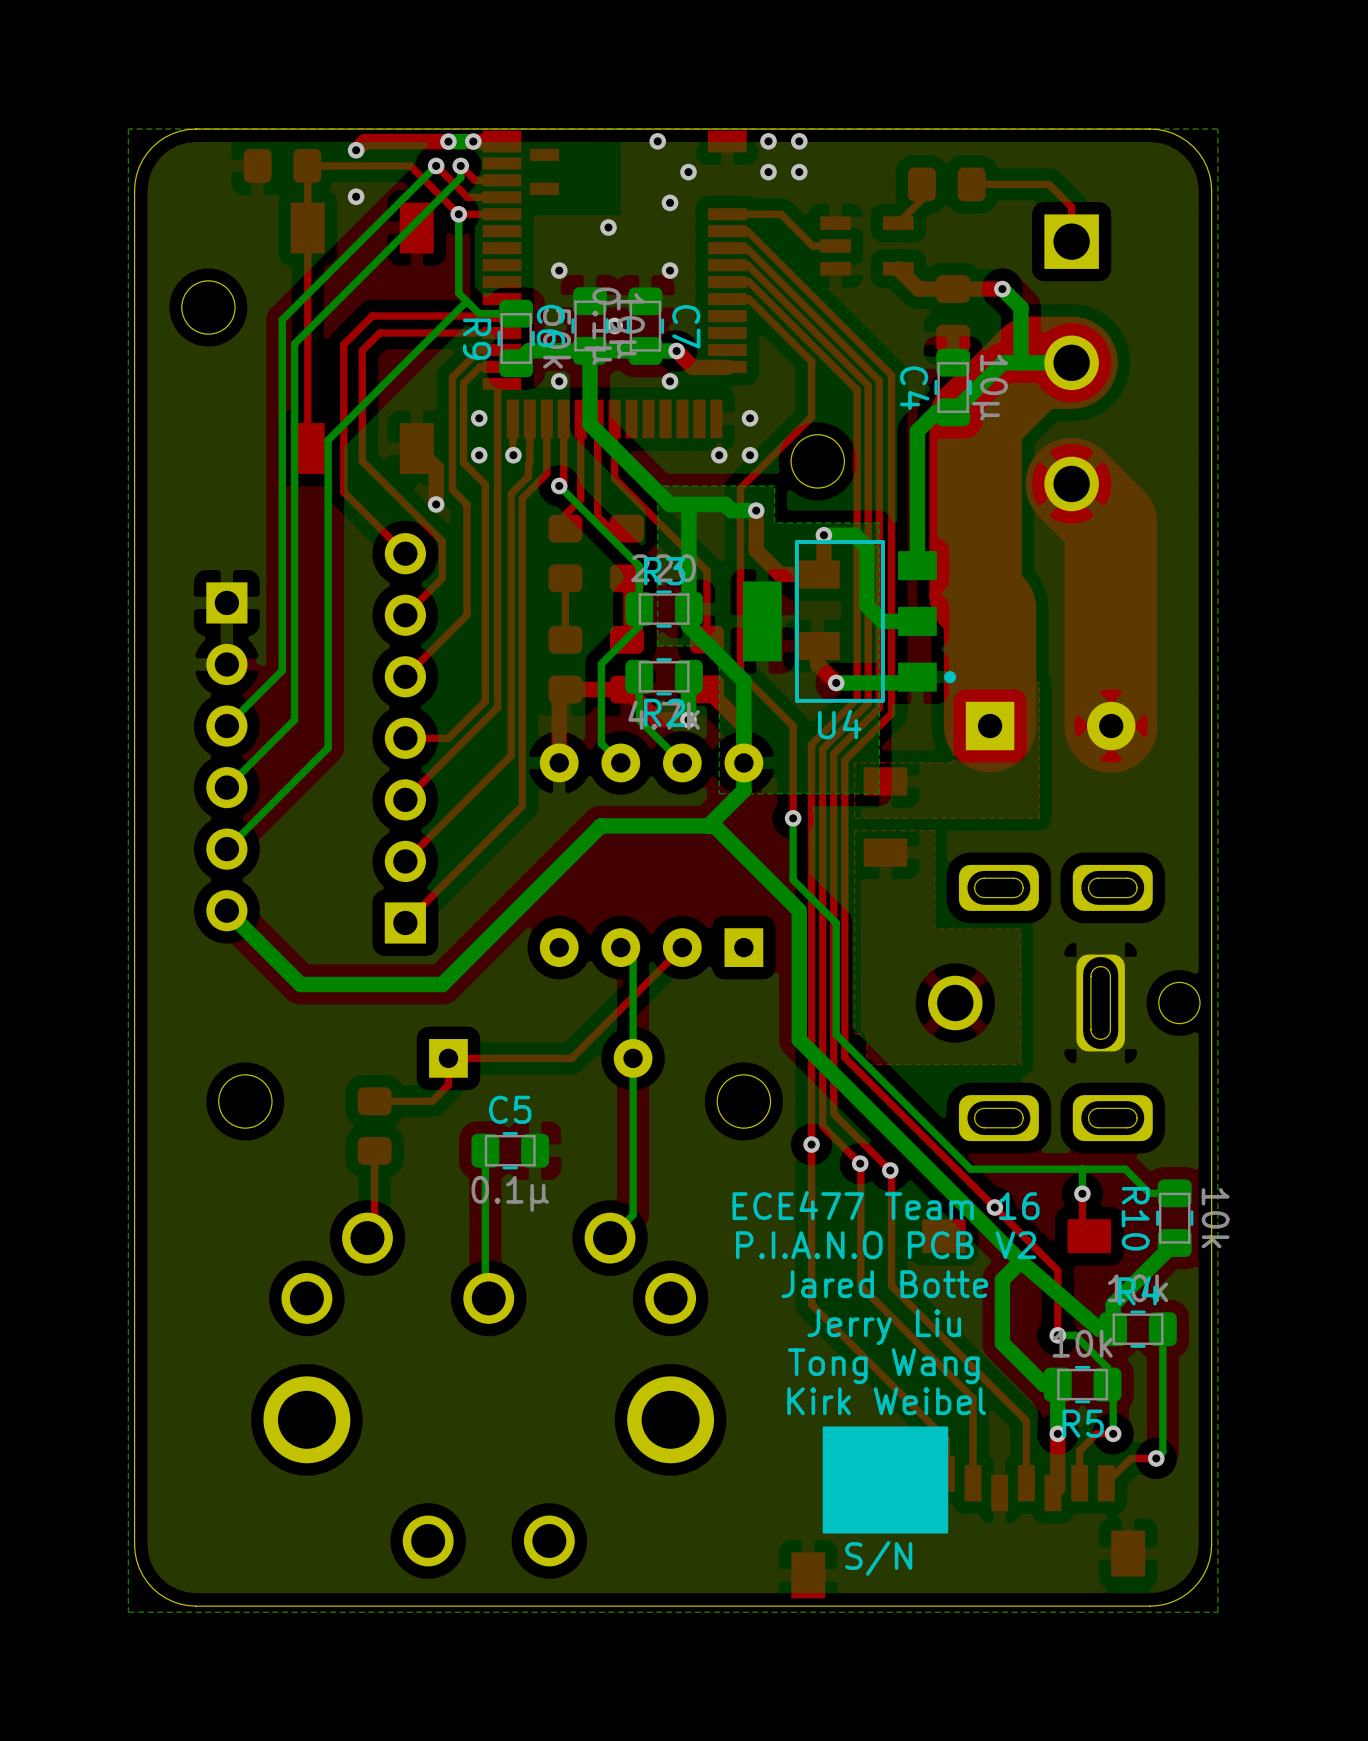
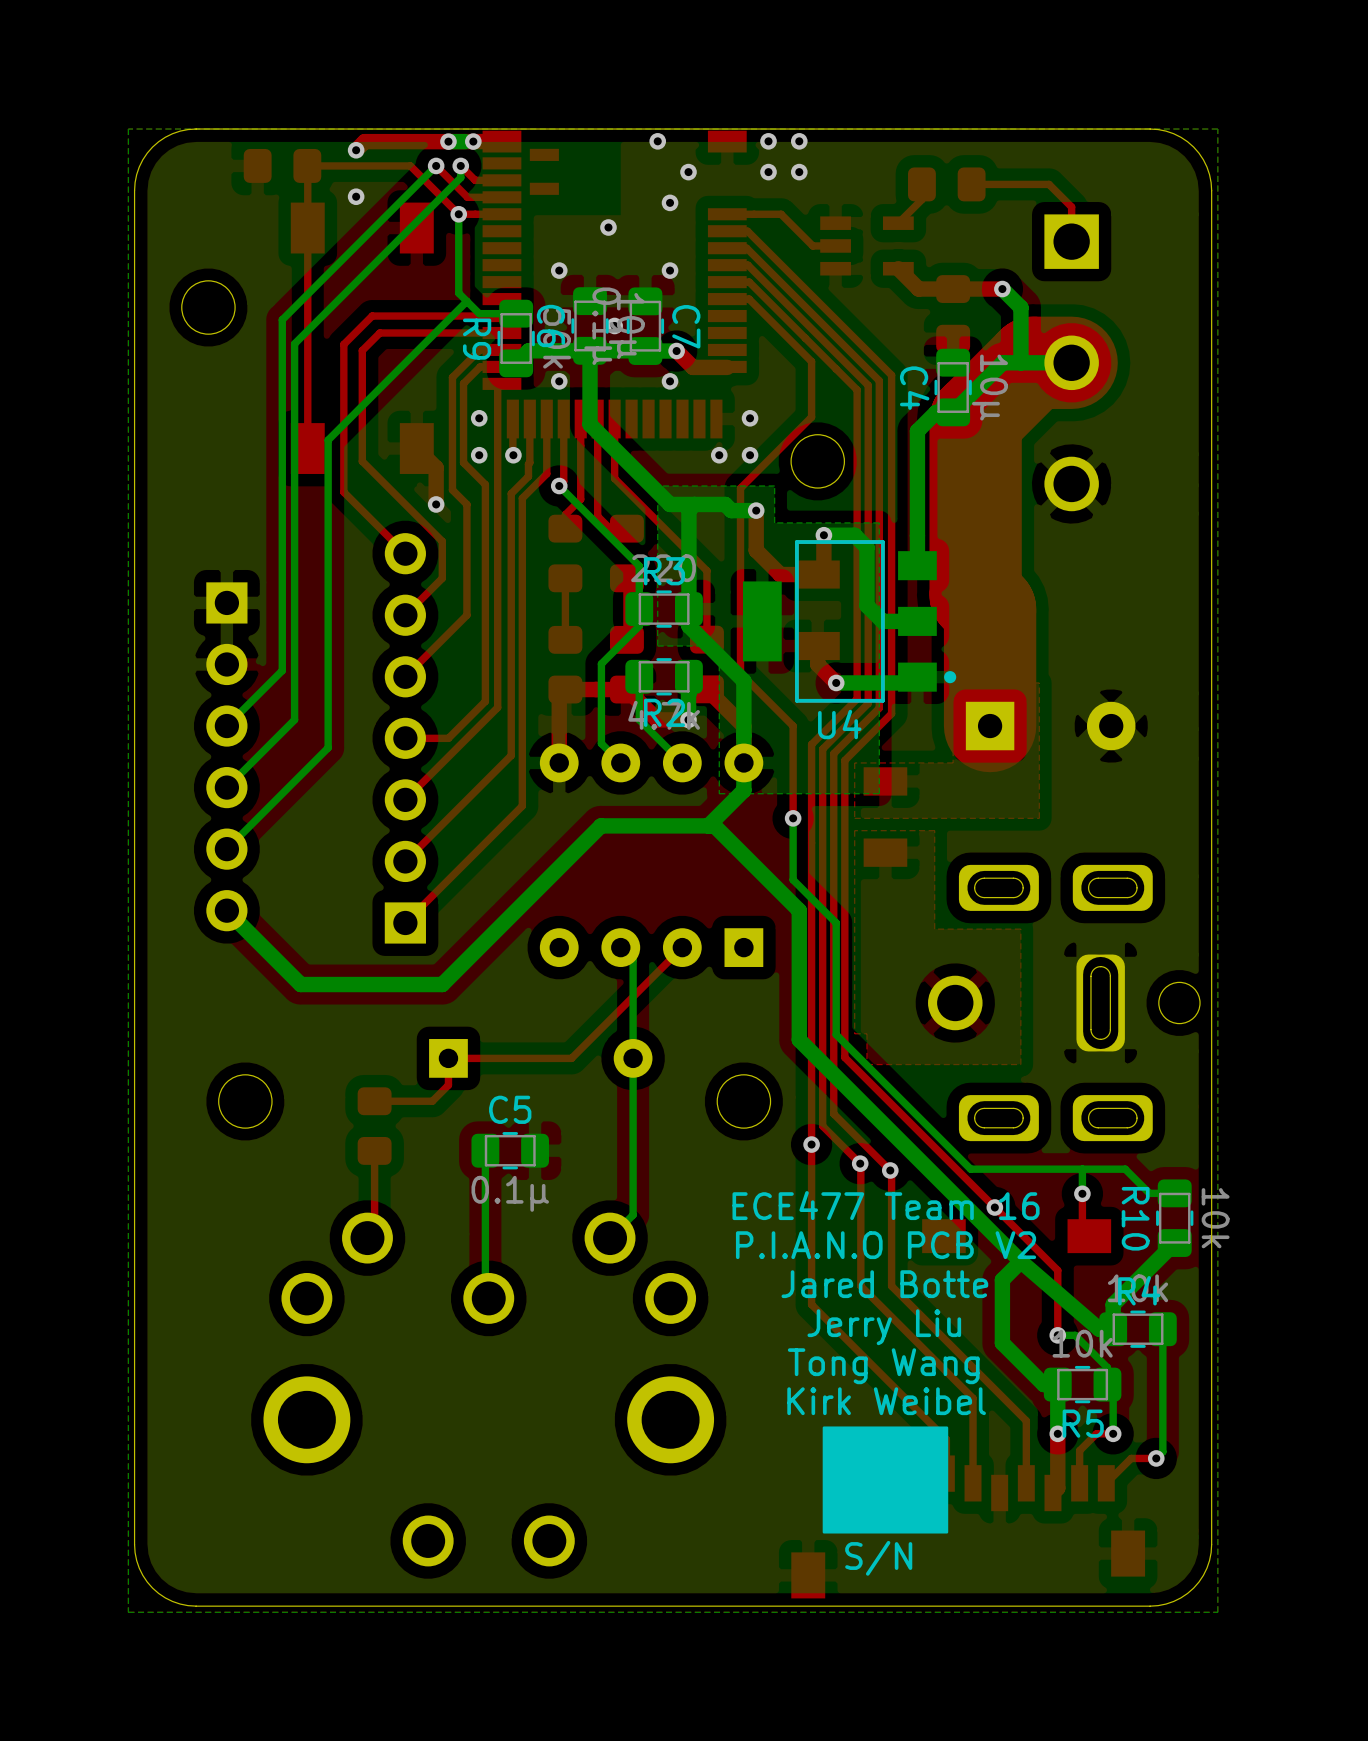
top track: (1071, 483) (1110, 523) (1111, 726) -> none

